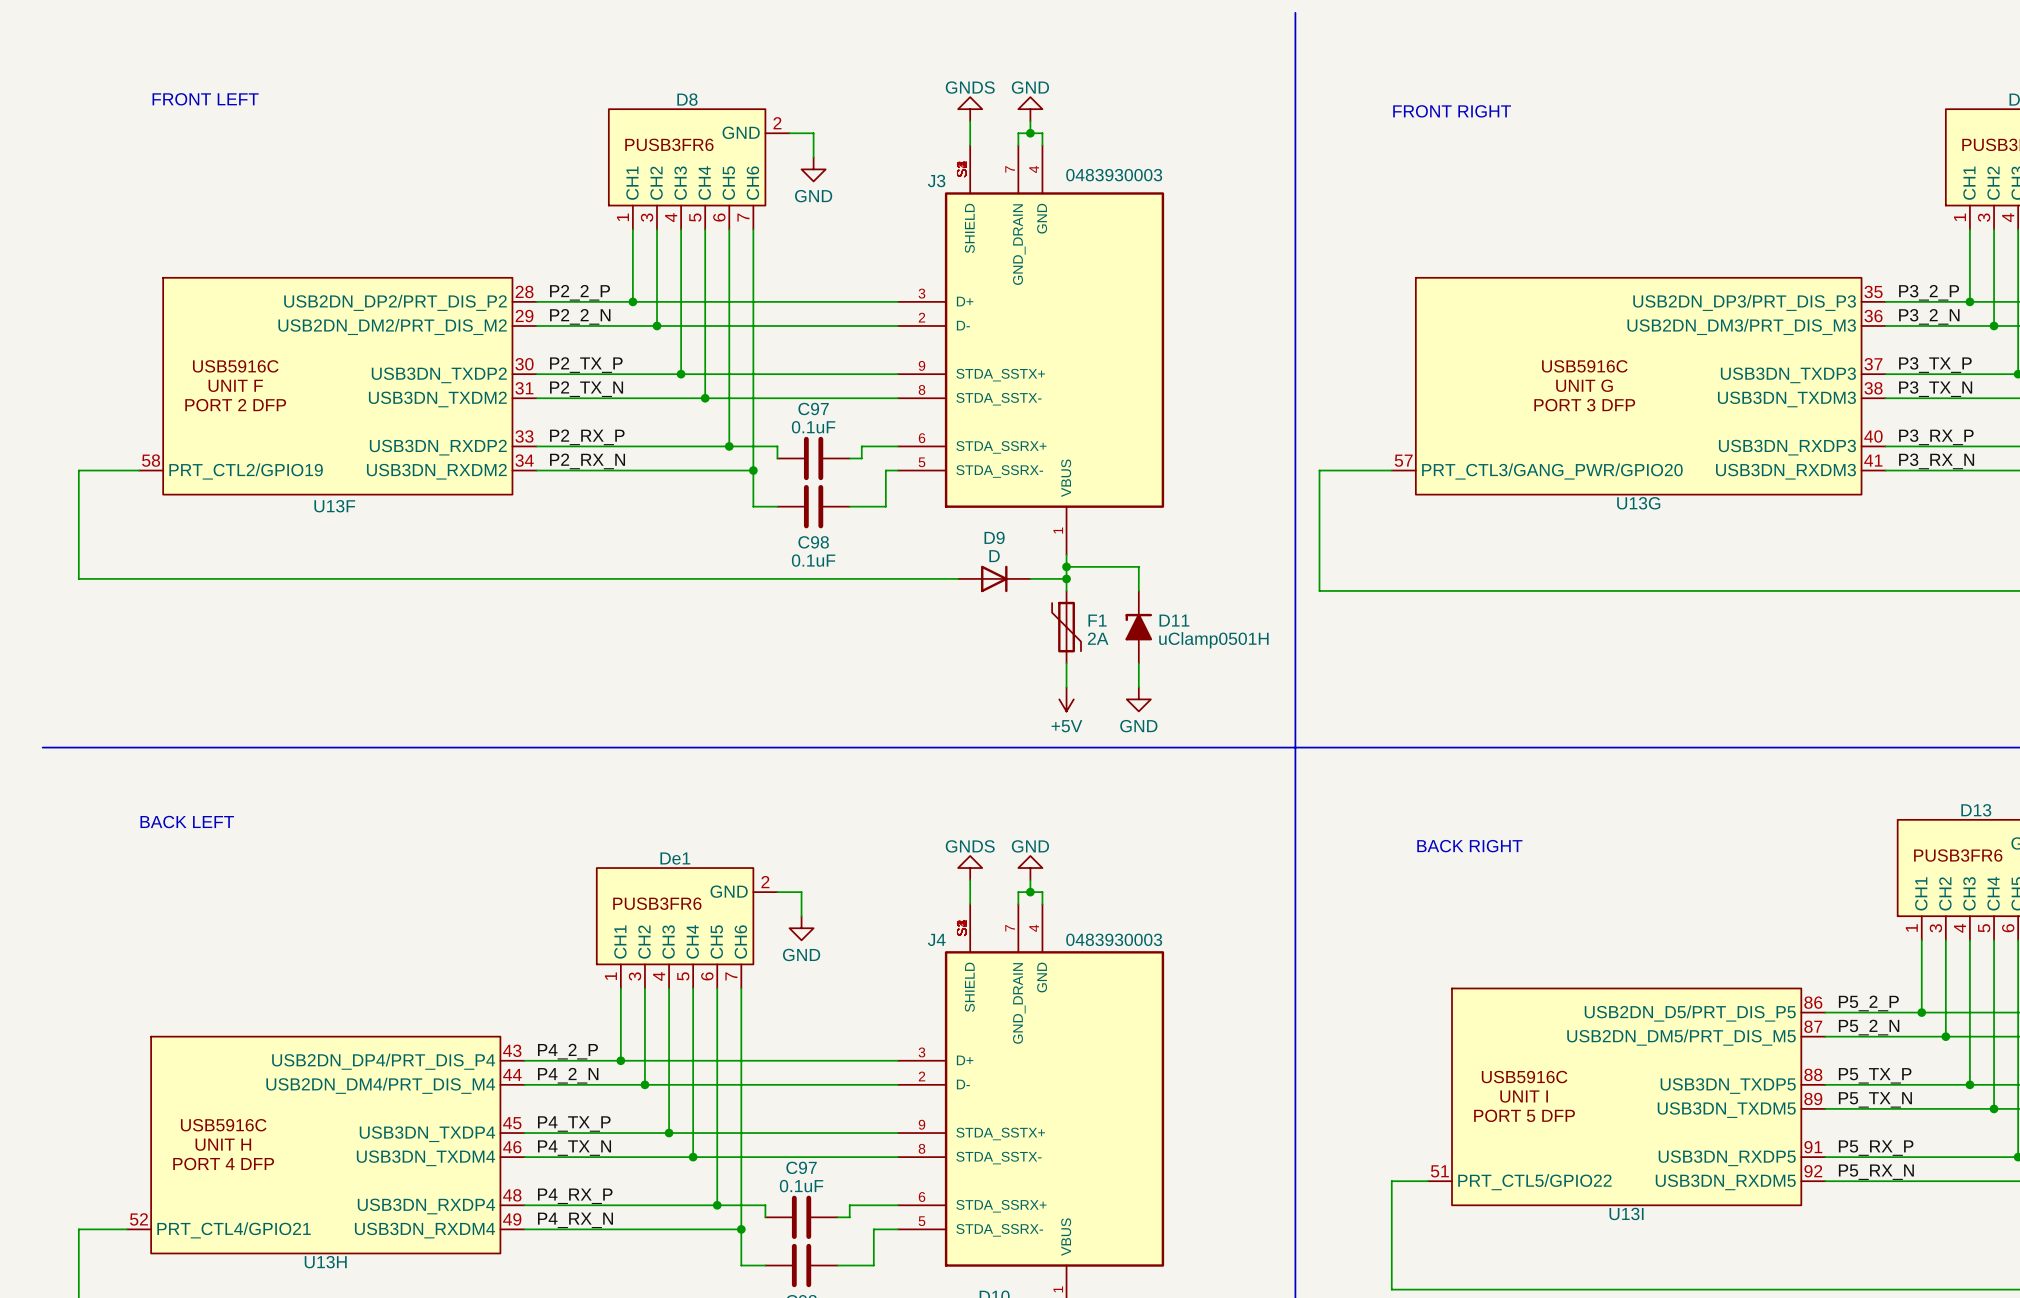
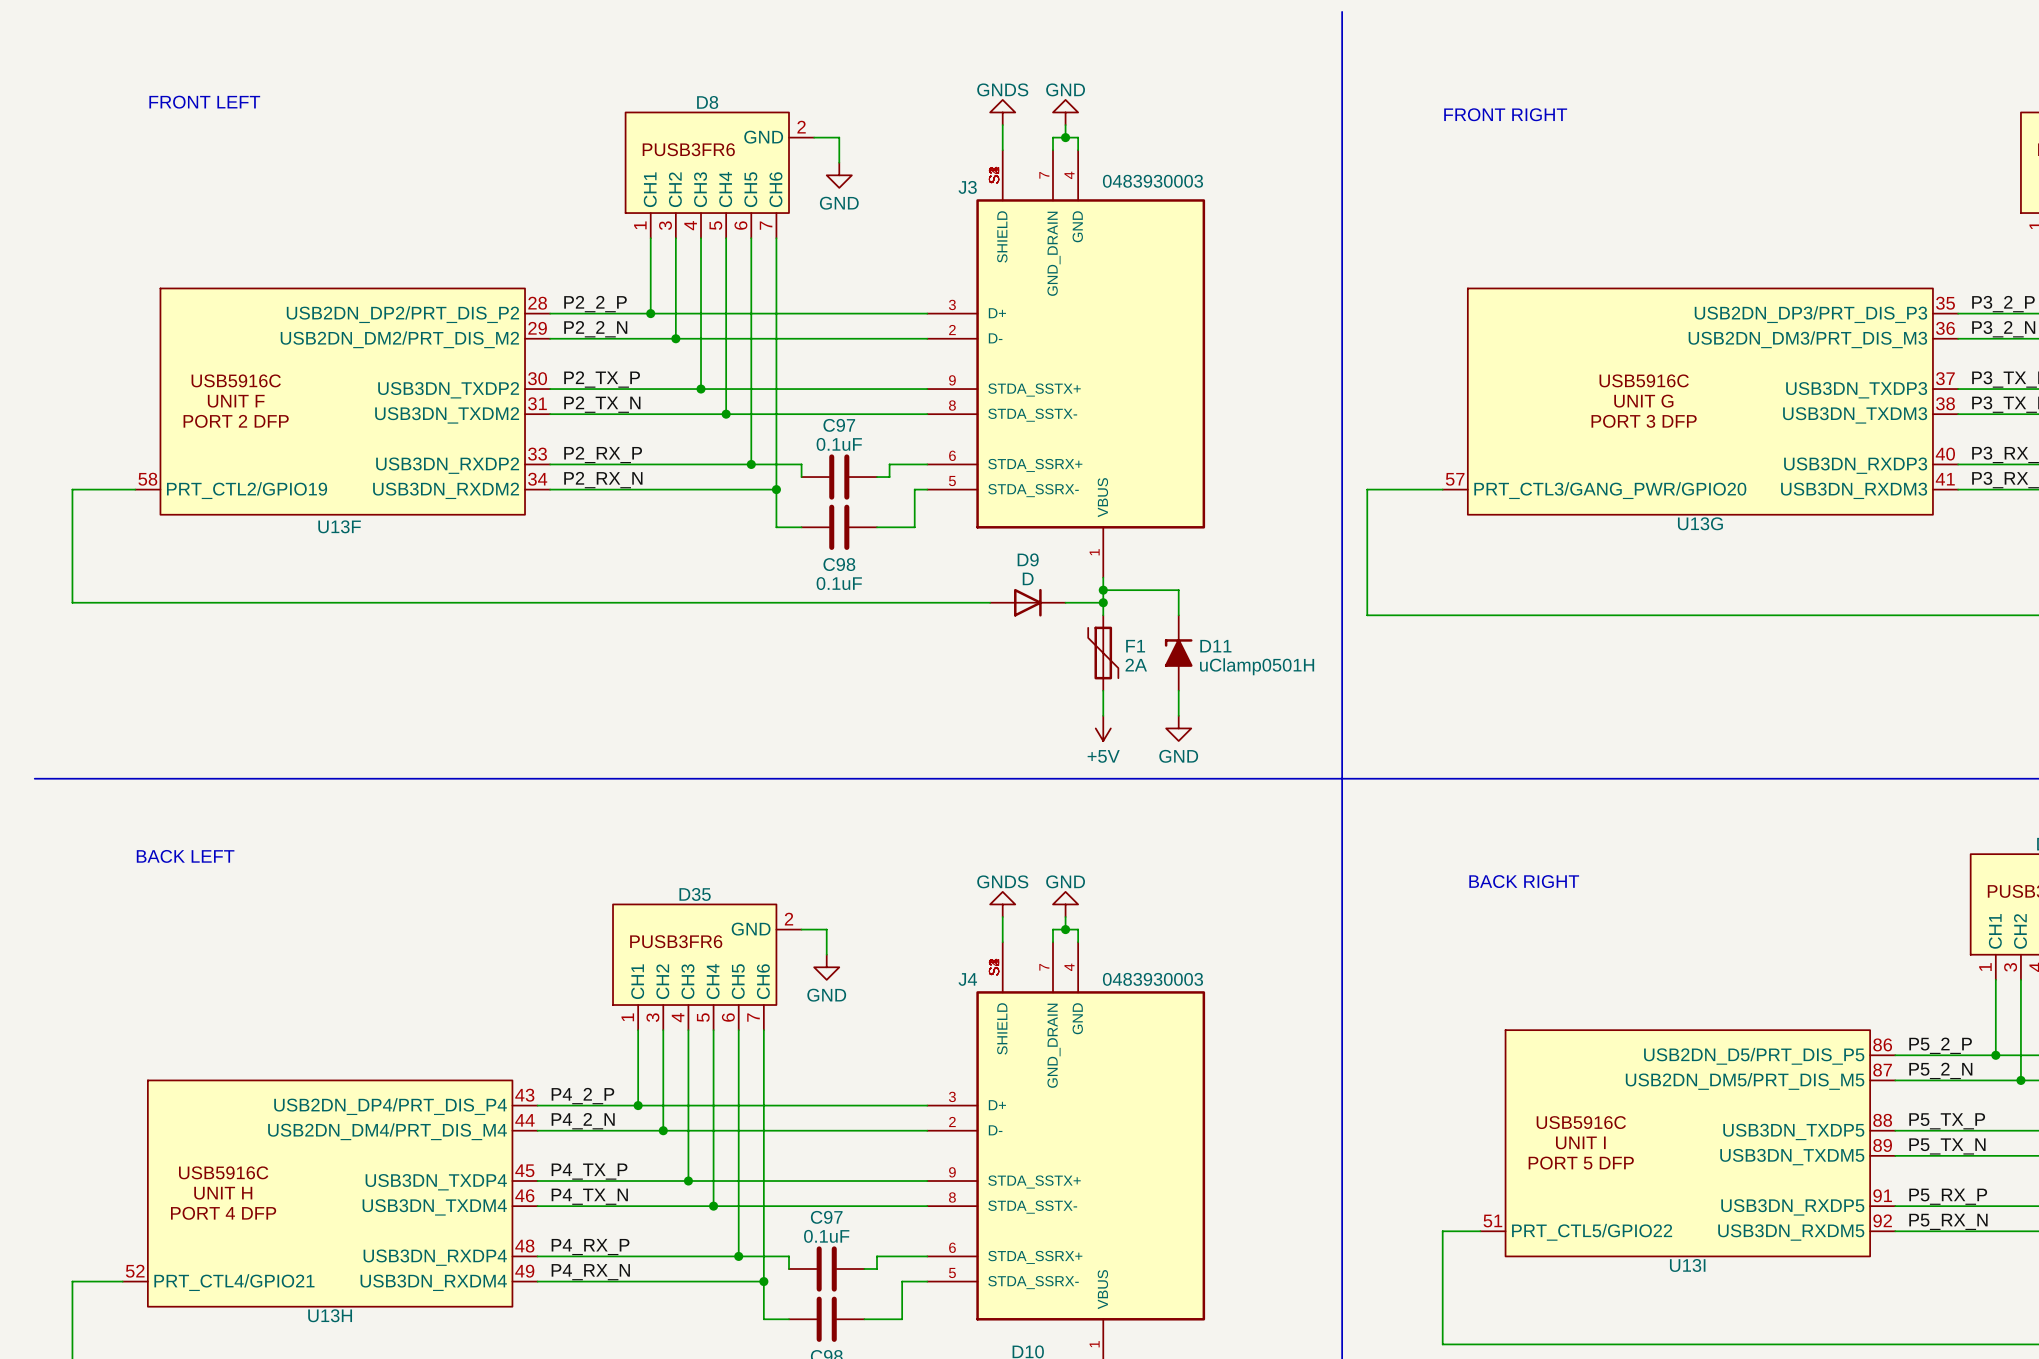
De1 name: De1 (675, 858) -> D35 (695, 894)

